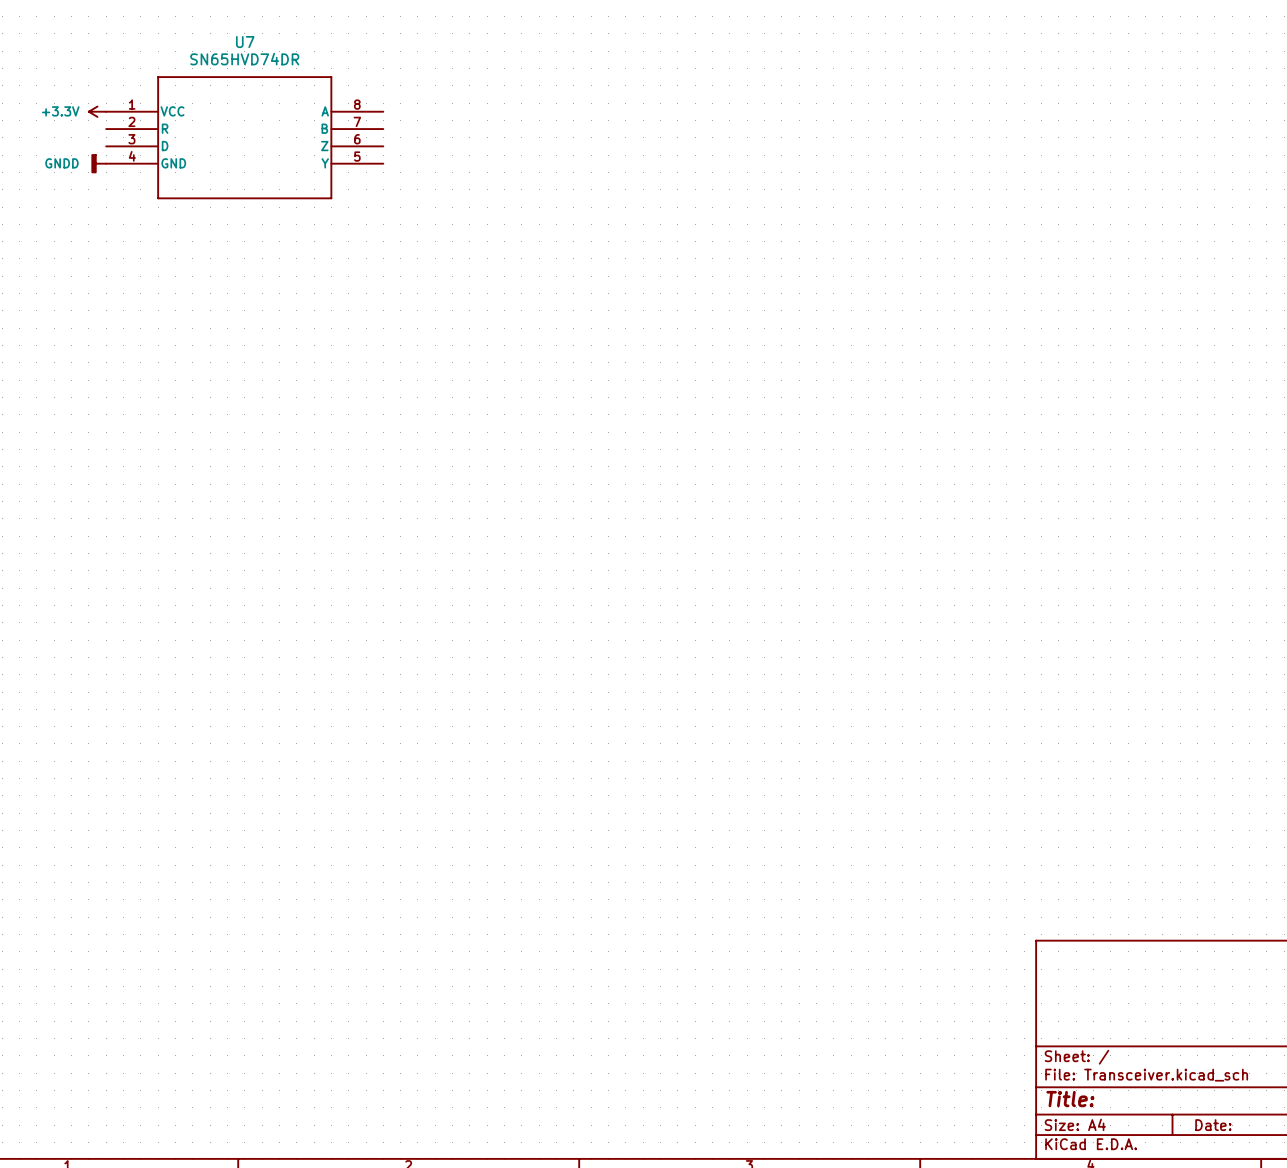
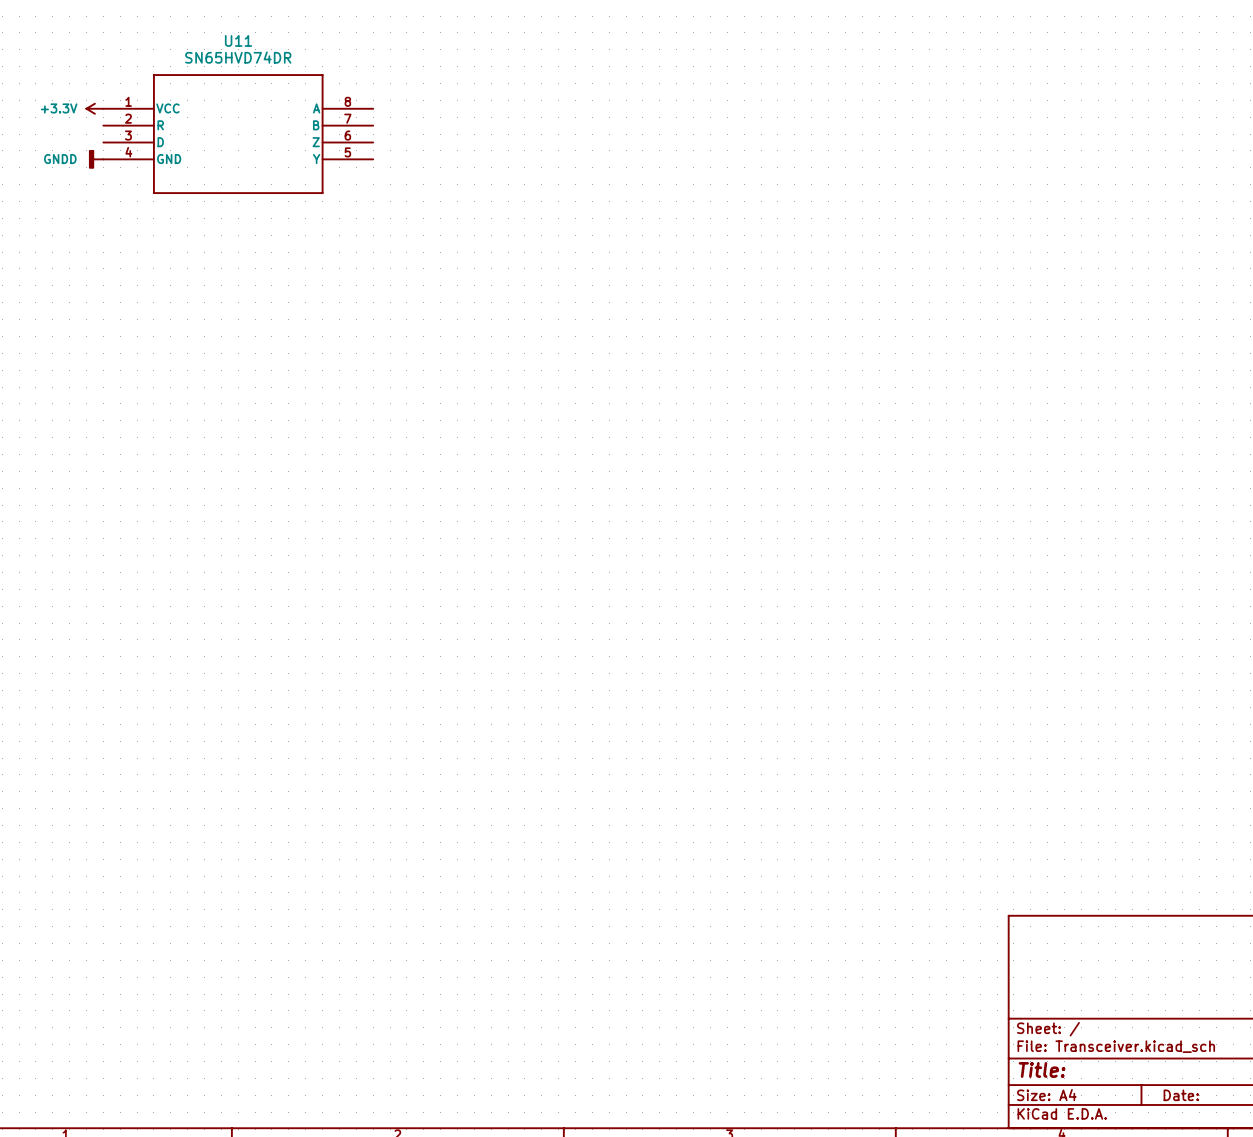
U7 name: U7 (245, 42) -> U11 (238, 40)

